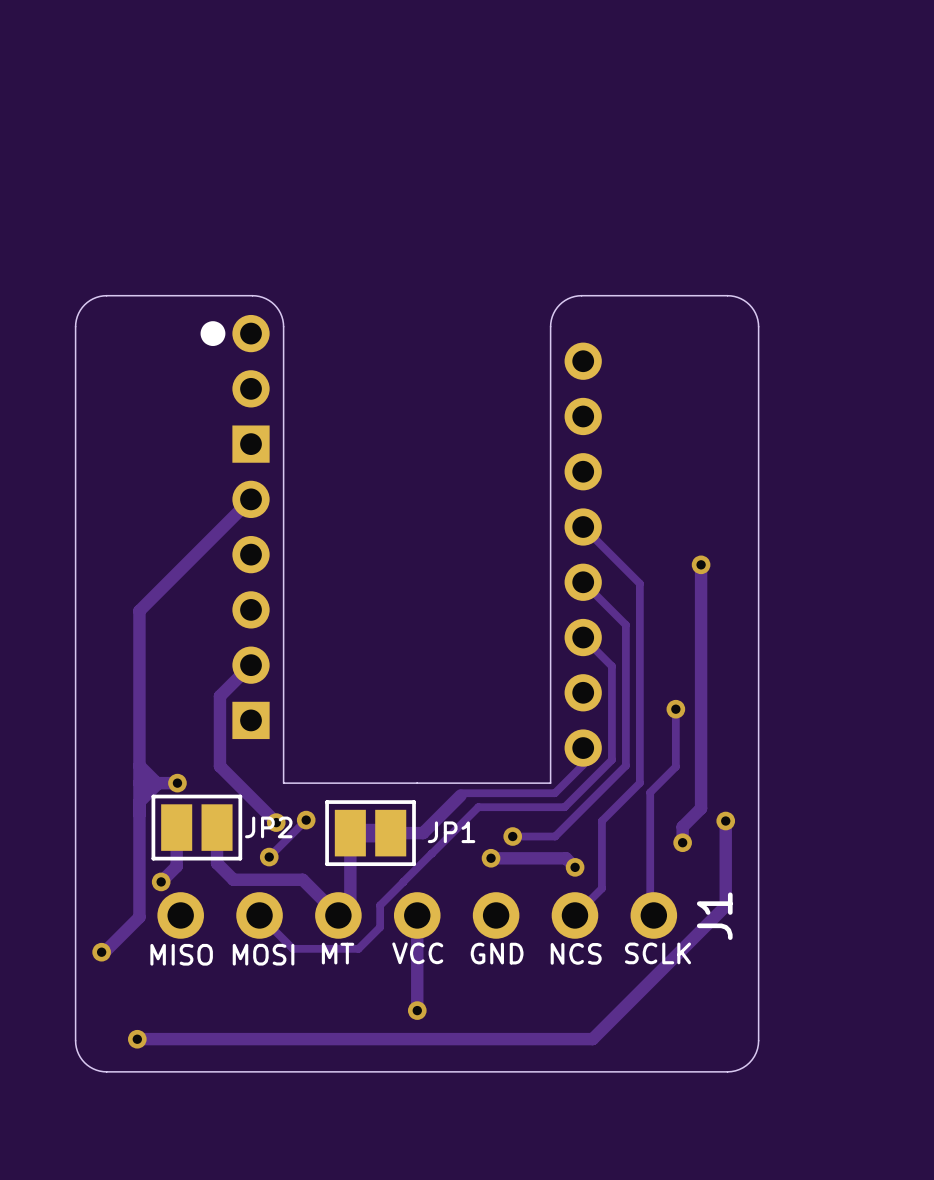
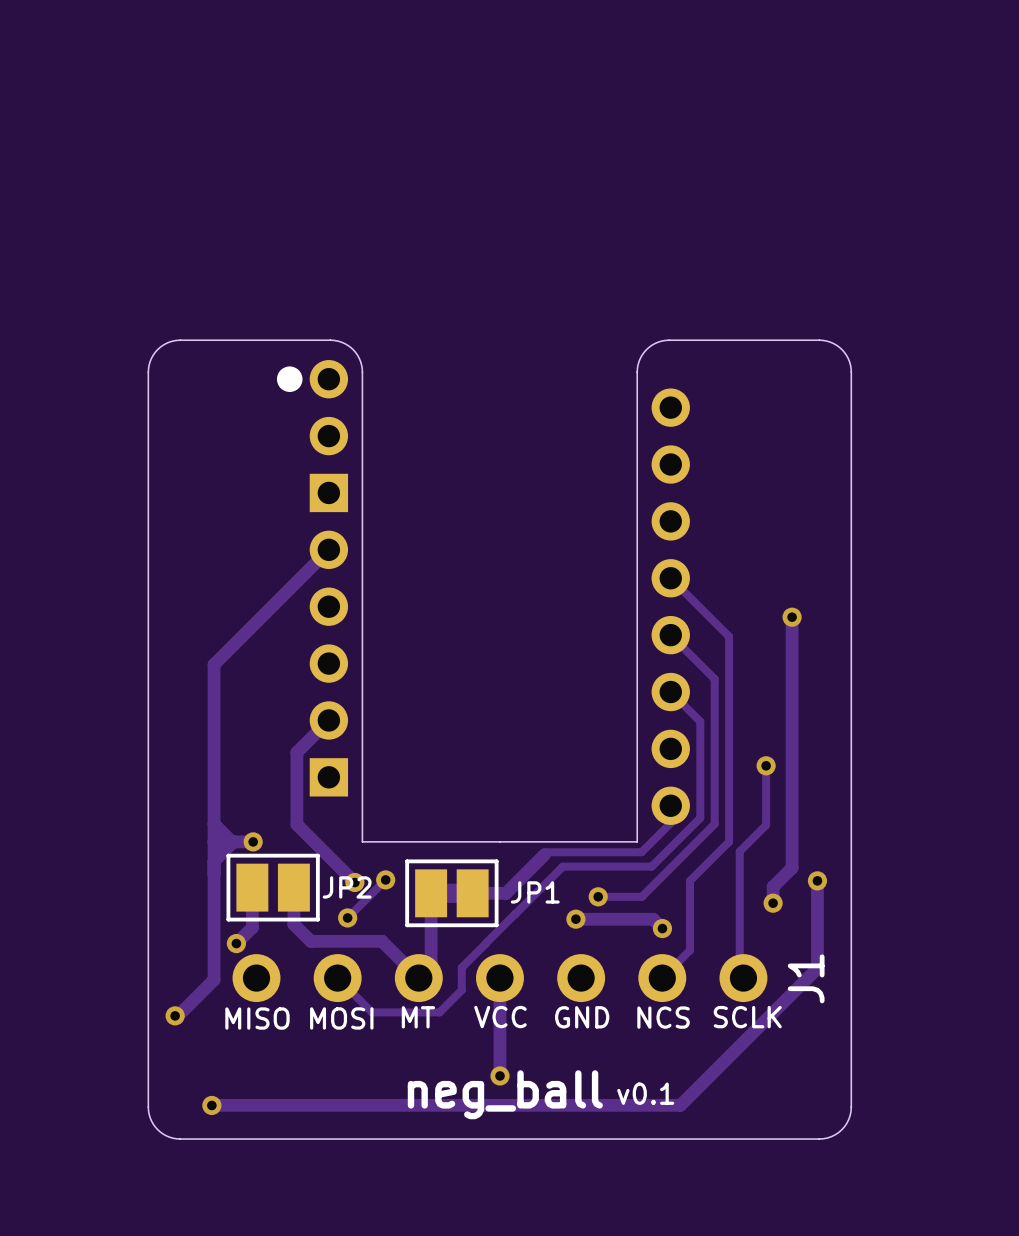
text: none -> v0.1 (645, 1093)
text: none -> neg_ball (505, 1094)

